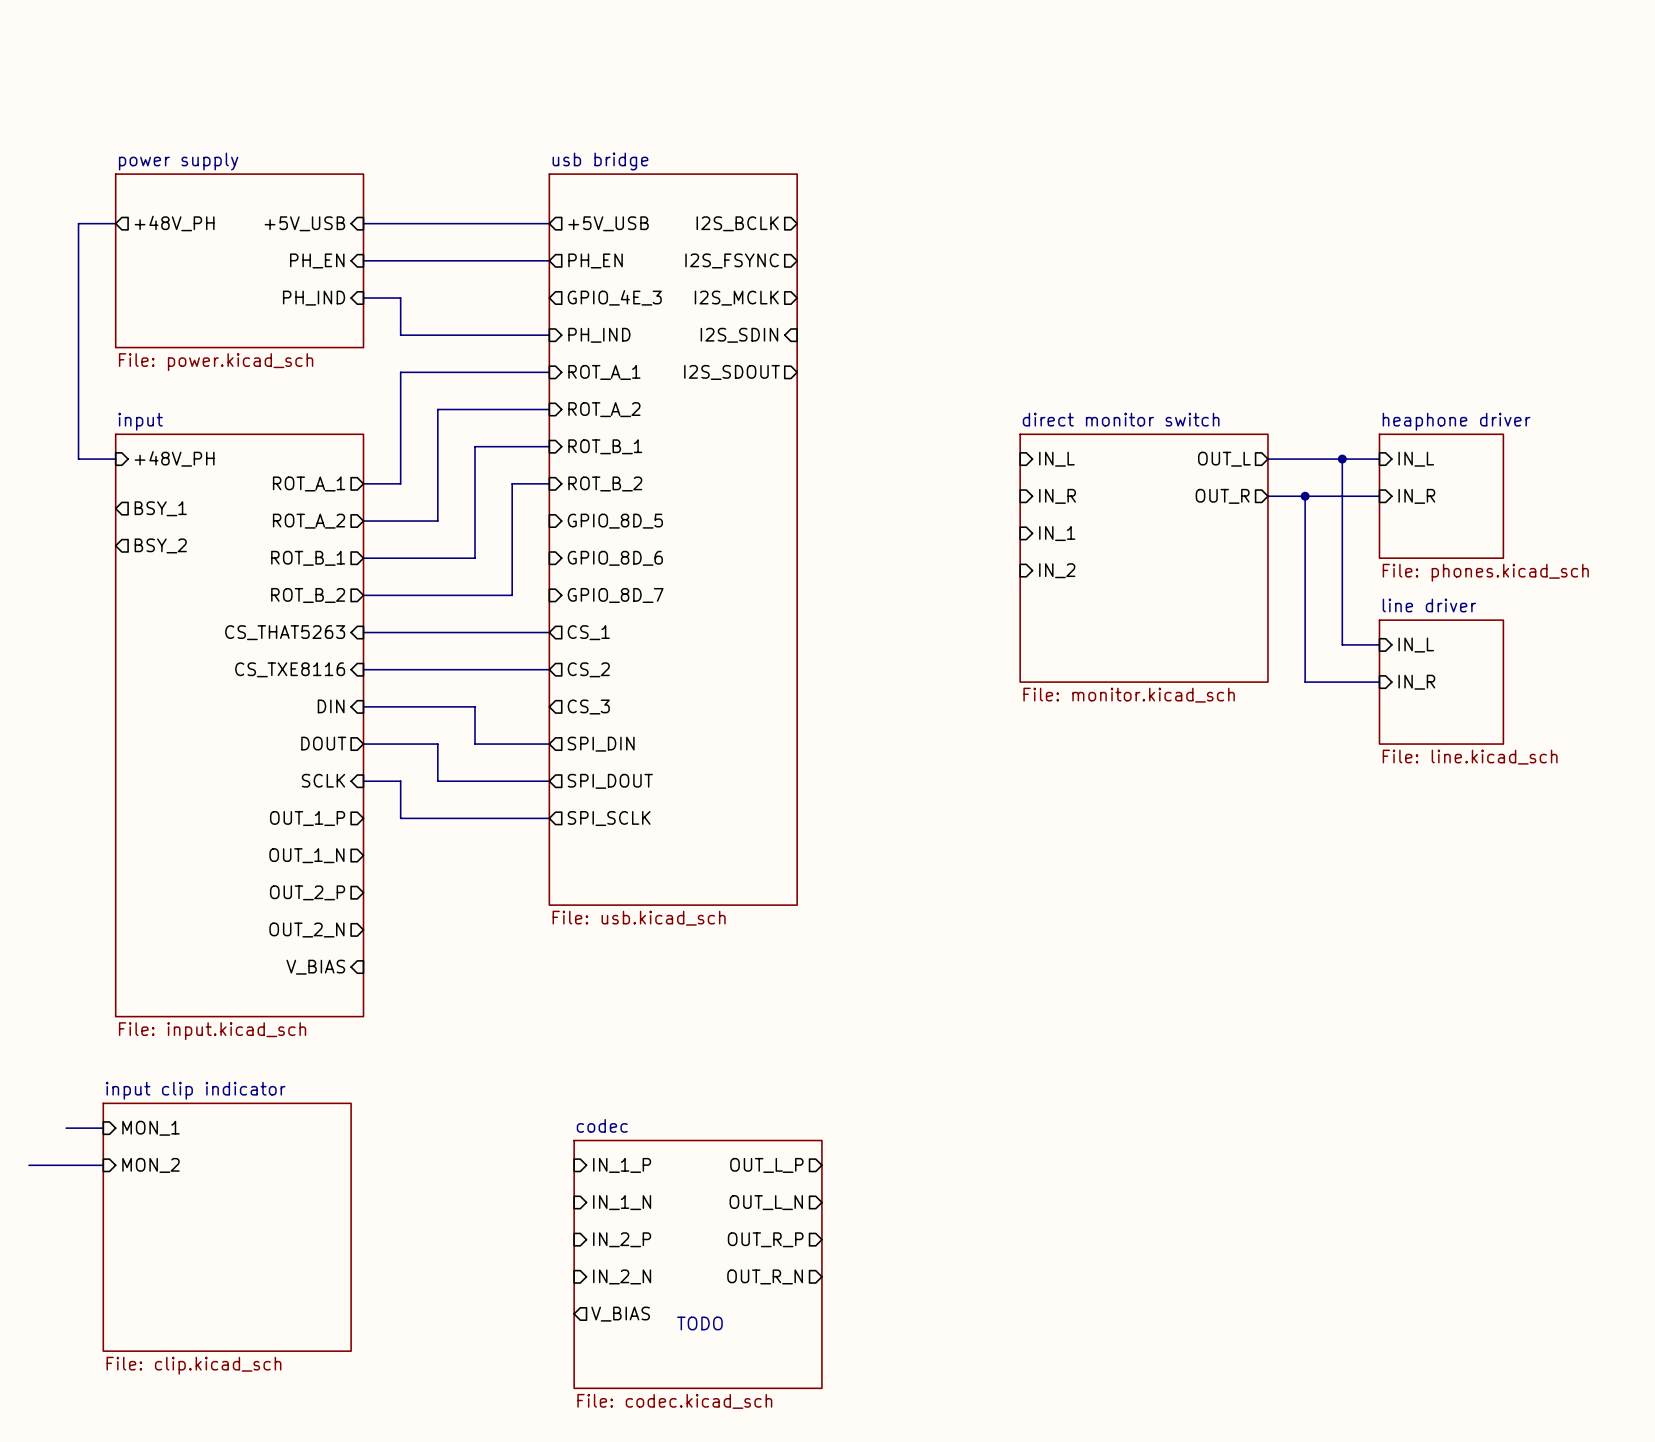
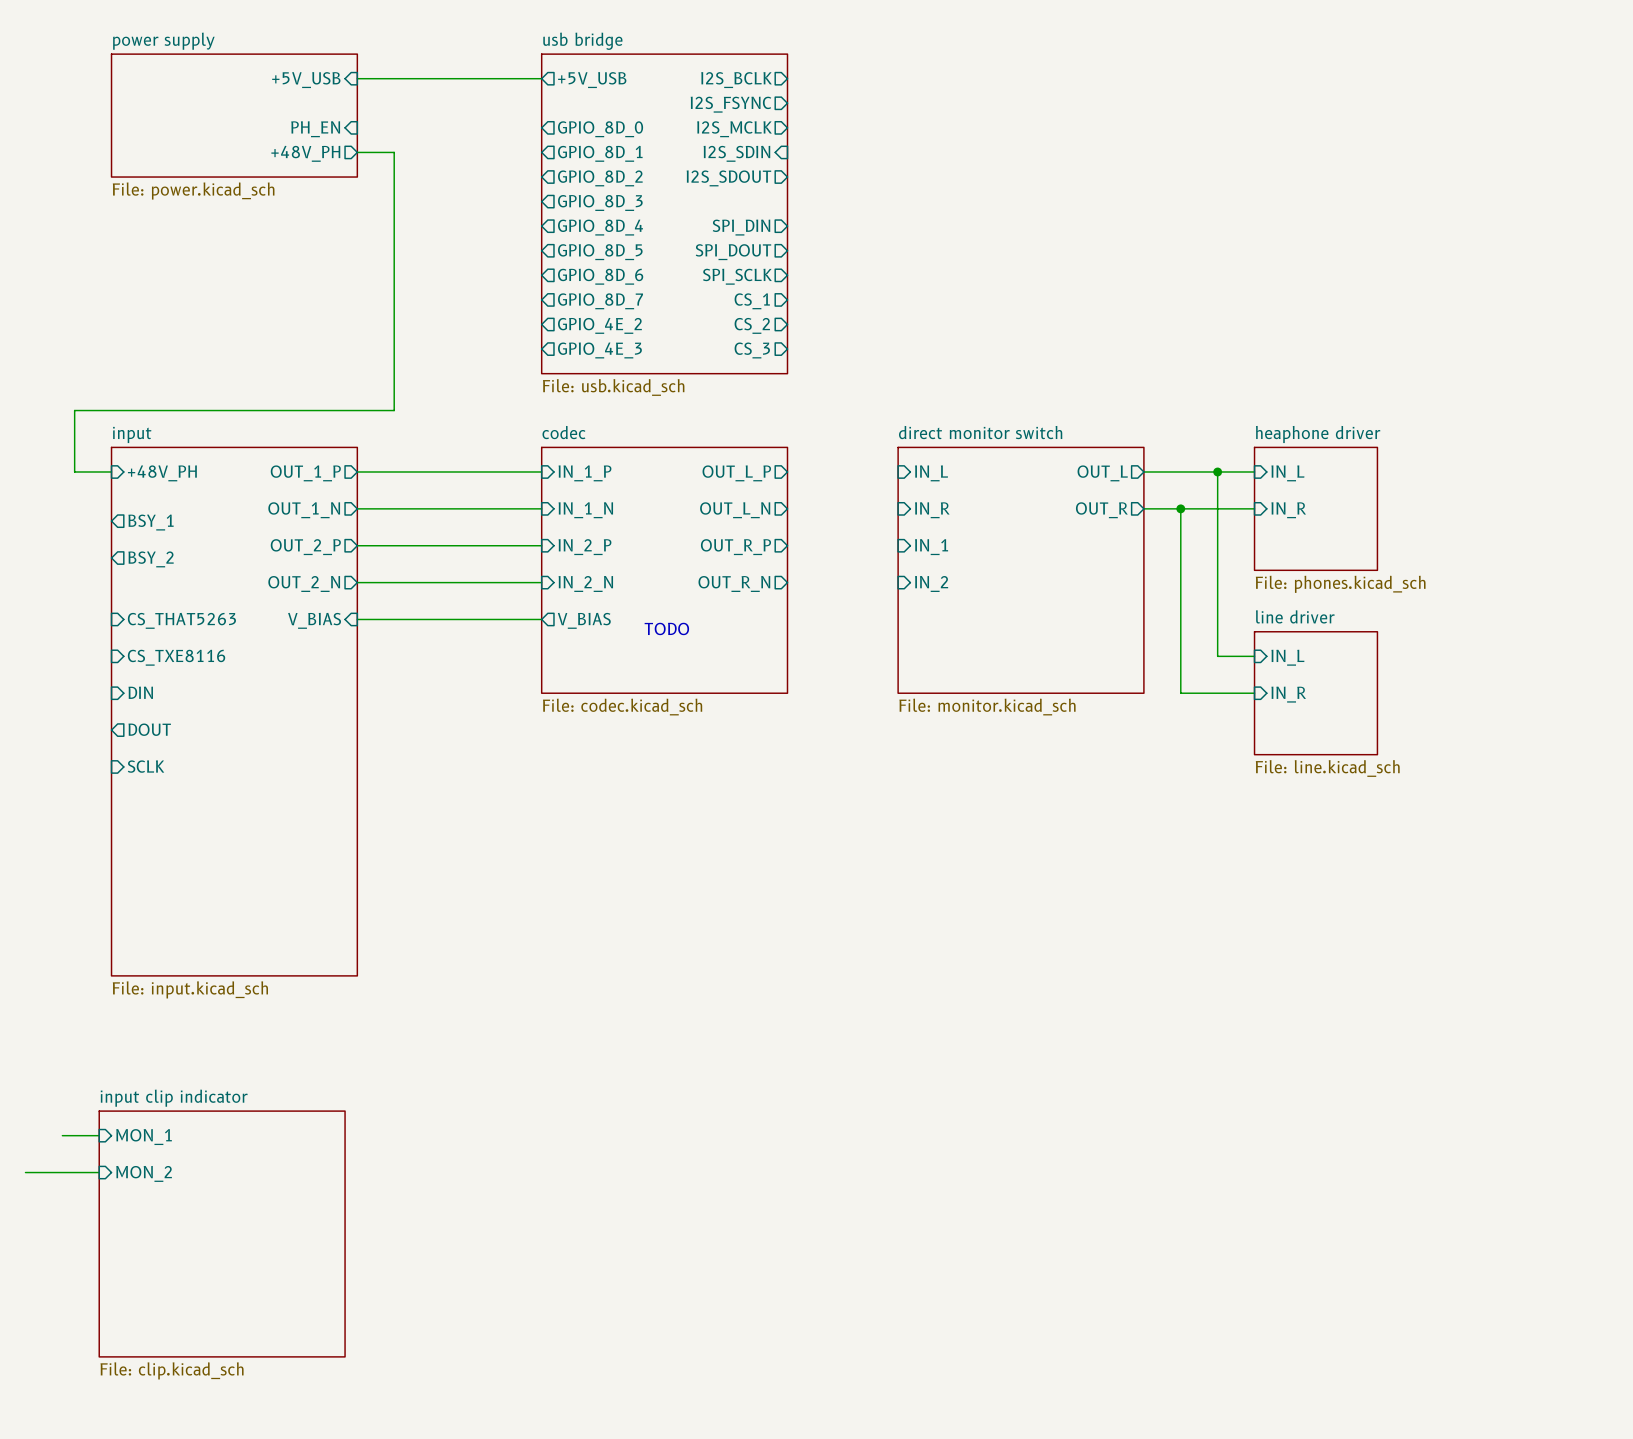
sheet pin: none -> +5V_USB (306, 80)
wire: none -> (357, 78) (541, 78)
sheet pin: none -> +5V_USB (592, 80)
sheet pin: none -> I2S_FSYNC (730, 104)
sheet power supply: none -> File: power.kicad_sch (234, 115)
sheet pin: none -> GPIO_8D_0 (600, 129)
sheet pin: none -> GPIO_8D_1 (600, 153)
sheet pin: none -> I2S_SDIN (736, 153)
sheet pin: none -> GPIO_8D_2 (600, 178)
sheet pin: none -> GPIO_8D_3 (600, 202)
sheet usb bridge: none -> File: usb.kicad_sch (664, 213)
sheet pin: none -> GPIO_8D_4 (600, 227)
sheet pin: none -> SPI_DIN (741, 227)
wire: (115, 223) (78, 223) (78, 397) -> none
sheet pin rotation: 0° (174, 223) -> 180° (305, 153)
sheet pin position: +48V_PH (174, 223) -> +48V_PH (305, 153)
sheet pin: +5V_USB (304, 223) -> none
wire: (363, 223) (549, 223) -> (357, 471) (541, 471)
sheet pin: +5V_USB (608, 223) -> none
sheet pin position: I2S_BCLK (737, 223) -> I2S_BCLK (736, 80)
sheet pin: none -> GPIO_8D_5 (600, 252)
sheet pin: none -> SPI_DOUT (733, 252)
sheet power supply: File: power.kicad_sch (239, 260) -> none
sheet pin position: PH_EN (317, 260) -> PH_EN (315, 129)
wire: (363, 260) (549, 260) -> (357, 508) (541, 508)
sheet pin: PH_EN (595, 260) -> GPIO_8D_6 (600, 276)
sheet pin: I2S_FSYNC (732, 260) -> SPI_SCLK (737, 276)
sheet pin: none -> GPIO_8D_7 (600, 301)
sheet pin: none -> CS_1 (752, 301)
sheet pin: GPIO_4E_3 (614, 297) -> none
sheet pin: PH_IND (314, 298) -> none
wire: (363, 298) (400, 298) -> (357, 152) (394, 152) (394, 312)
sheet pin position: I2S_MCLK (736, 298) -> I2S_MCLK (734, 129)
sheet pin: none -> GPIO_4E_2 (599, 325)
sheet pin: none -> CS_2 (752, 325)
wire: (400, 335) (549, 335) -> (394, 349) (394, 385)
sheet pin shape: input (599, 335) -> output (599, 350)
sheet pin: PH_IND (599, 335) -> GPIO_4E_3 (599, 350)
sheet pin shape: input (739, 335) -> output (752, 350)
sheet pin: I2S_SDIN (739, 335) -> CS_3 (752, 350)
wire: (400, 372) (549, 372) -> none
sheet pin: ROT_A_1 (604, 372) -> none
sheet pin position: I2S_SDOUT (732, 372) -> I2S_SDOUT (728, 178)
wire: (400, 397) (400, 483) (363, 483) -> (394, 410) (74, 410)
wire: (549, 409) (437, 409) (437, 521) (363, 521) -> none
sheet pin: ROT_A_2 (604, 409) -> none
wire: (549, 446) (475, 446) (475, 558) (363, 558) -> none
sheet pin: ROT_B_1 (605, 446) -> none
sheet pin: none -> OUT_1_P (305, 473)
sheet pin: none -> IN_1_P (584, 473)
sheet pin: none -> OUT_L_P (736, 473)
sheet pin position: IN_L (1056, 459) -> IN_L (931, 473)
sheet pin position: OUT_L (1224, 459) -> OUT_L (1102, 473)
junction: none -> (1217, 471)
wire: (1267, 459) (1379, 459) -> (1254, 471) (1143, 471)
sheet pin: none -> IN_L (1287, 473)
wire: (1342, 459) (1342, 644) (1379, 644) -> (1217, 471) (1217, 656) (1254, 656)
junction: (1342, 459) -> none
sheet pin: IN_L (1416, 459) -> none
sheet pin: ROT_A_1 (309, 483) -> none
wire: (549, 483) (512, 483) (512, 595) (363, 595) -> none
sheet pin: ROT_B_2 (605, 483) -> none
sheet pin: none -> OUT_1_N (304, 510)
sheet pin: none -> IN_1_N (585, 510)
sheet pin: none -> OUT_L_N (735, 510)
sheet pin position: IN_R (1057, 496) -> IN_R (932, 510)
junction: none -> (1180, 508)
sheet pin position: OUT_R (1222, 496) -> OUT_R (1101, 510)
wire: (1267, 496) (1379, 496) -> (1254, 508) (1143, 508)
wire: (1305, 496) (1305, 682) (1379, 682) -> (1180, 508) (1180, 693) (1254, 693)
junction: (1305, 496) -> none
sheet pin: none -> IN_R (1288, 510)
sheet pin: IN_R (1416, 496) -> none
sheet heaphone driver position: (1441, 496) -> (1315, 508)
sheet pin: ROT_A_2 (309, 521) -> none
sheet pin: GPIO_8D_5 (615, 521) -> none
sheet pin: none -> OUT_2_P (305, 547)
wire: none -> (357, 545) (541, 545)
sheet pin: none -> IN_2_P (584, 547)
sheet pin: none -> OUT_R_P (735, 547)
sheet pin position: IN_1 (1057, 533) -> IN_1 (931, 547)
sheet usb bridge: File: usb.kicad_sch (673, 539) -> none
sheet pin: ROT_B_1 (308, 558) -> none
sheet pin: GPIO_8D_6 (615, 558) -> none
sheet codec: none -> File: codec.kicad_sch (664, 570)
sheet direct monitor switch position: (1144, 558) -> (1021, 570)
sheet pin: none -> OUT_2_N (304, 583)
sheet pin: none -> IN_2_N (585, 583)
sheet pin: none -> OUT_R_N (734, 583)
sheet pin position: IN_2 (1057, 570) -> IN_2 (931, 583)
sheet pin: ROT_B_2 (308, 595) -> none
sheet pin: GPIO_8D_7 (615, 595) -> none
sheet pin: none -> V_BIAS (314, 620)
sheet pin: none -> V_BIAS (584, 620)
text: none -> TODO (666, 628)
sheet pin rotation: 0° (285, 632) -> 180° (181, 620)
wire: (363, 632) (549, 632) -> (357, 582) (541, 582)
sheet pin: CS_1 (588, 632) -> none
sheet pin: none -> IN_L (1287, 657)
sheet pin: IN_L (1416, 645) -> none
sheet pin rotation: 0° (290, 669) -> 180° (176, 657)
wire: (363, 669) (549, 669) -> (357, 619) (541, 619)
sheet pin: CS_2 (588, 669) -> none
sheet pin: none -> IN_R (1288, 694)
sheet pin: IN_R (1416, 682) -> none
sheet line driver position: (1441, 682) -> (1315, 693)
sheet input: none -> File: input.kicad_sch (234, 711)
sheet pin rotation: 0° (331, 706) -> 180° (140, 692)
sheet pin position: DIN (331, 706) -> DIN (140, 692)
wire: (363, 706) (475, 706) (475, 744) (549, 744) -> none
sheet pin: CS_3 (588, 707) -> none
sheet input: File: input.kicad_sch (239, 725) -> none
sheet pin rotation: 0° (323, 743) -> 180° (149, 729)
sheet pin position: DOUT (323, 743) -> DOUT (149, 729)
wire: (363, 744) (437, 744) (437, 781) (549, 781) -> none
sheet pin: SPI_DIN (601, 744) -> none
sheet pin rotation: 0° (323, 780) -> 180° (146, 766)
sheet pin position: SCLK (323, 780) -> SCLK (146, 766)
wire: (363, 781) (400, 781) (400, 818) (549, 818) -> none
sheet pin: SPI_DOUT (610, 781) -> none
sheet pin: OUT_1_P (307, 818) -> none
sheet pin: SPI_SCLK (609, 818) -> none
sheet pin: OUT_1_N (306, 855) -> none
sheet pin: OUT_2_P (307, 892) -> none
sheet pin: OUT_2_N (306, 930) -> none
sheet pin: V_BIAS (315, 967) -> none
sheet pin: IN_1_P (622, 1165) -> none
sheet pin: OUT_L_P (766, 1165) -> none
sheet pin: IN_1_N (622, 1202) -> none
sheet pin: OUT_L_N (766, 1202) -> none
sheet pin: IN_2_P (622, 1239) -> none
sheet pin: OUT_R_P (765, 1239) -> none
sheet codec: File: codec.kicad_sch (698, 1264) -> none
sheet pin: IN_2_N (622, 1276) -> none
sheet pin: OUT_R_N (765, 1276) -> none
sheet pin: V_BIAS (620, 1314) -> none
text: TODO (699, 1323) -> none

